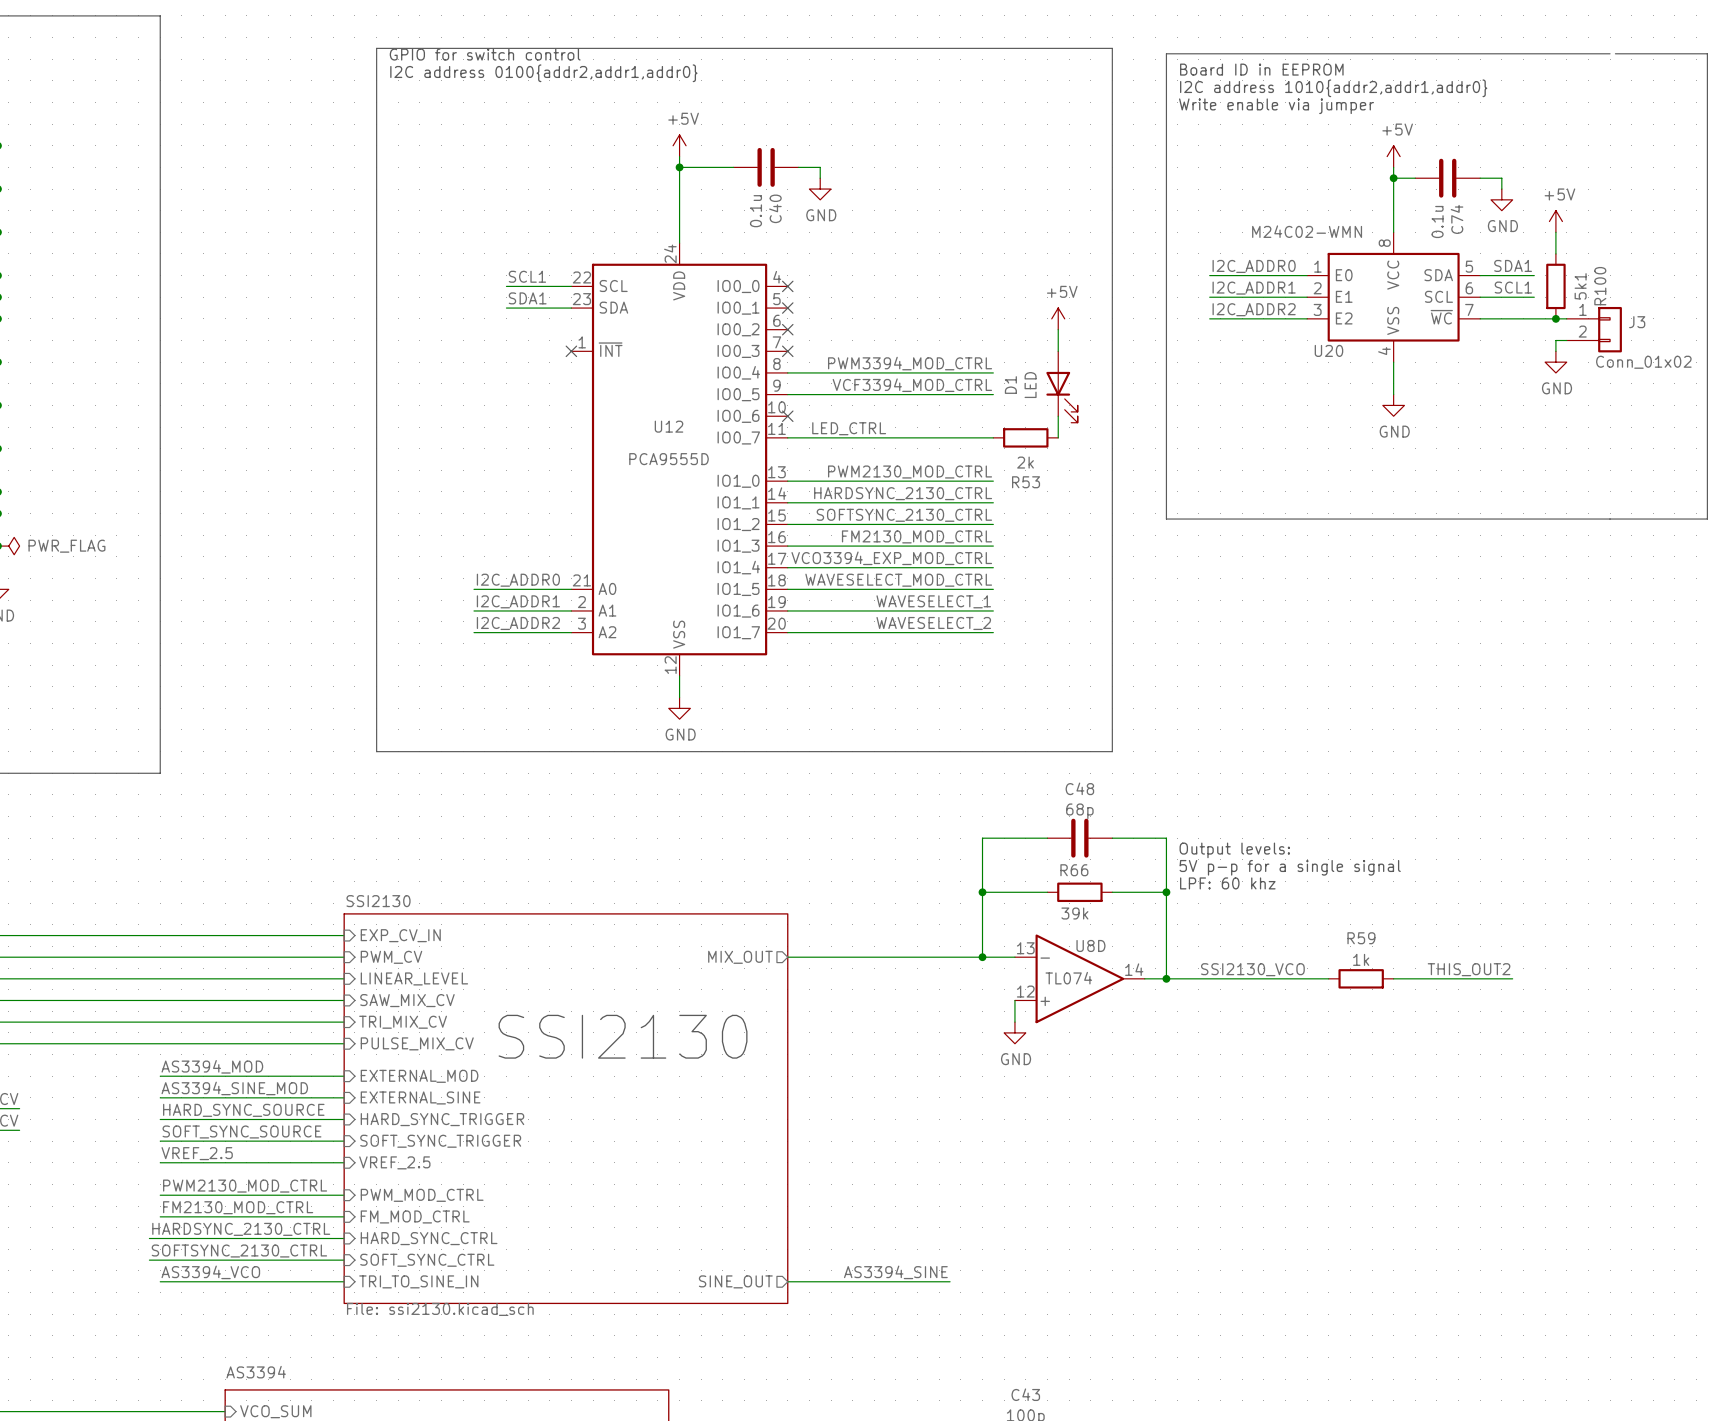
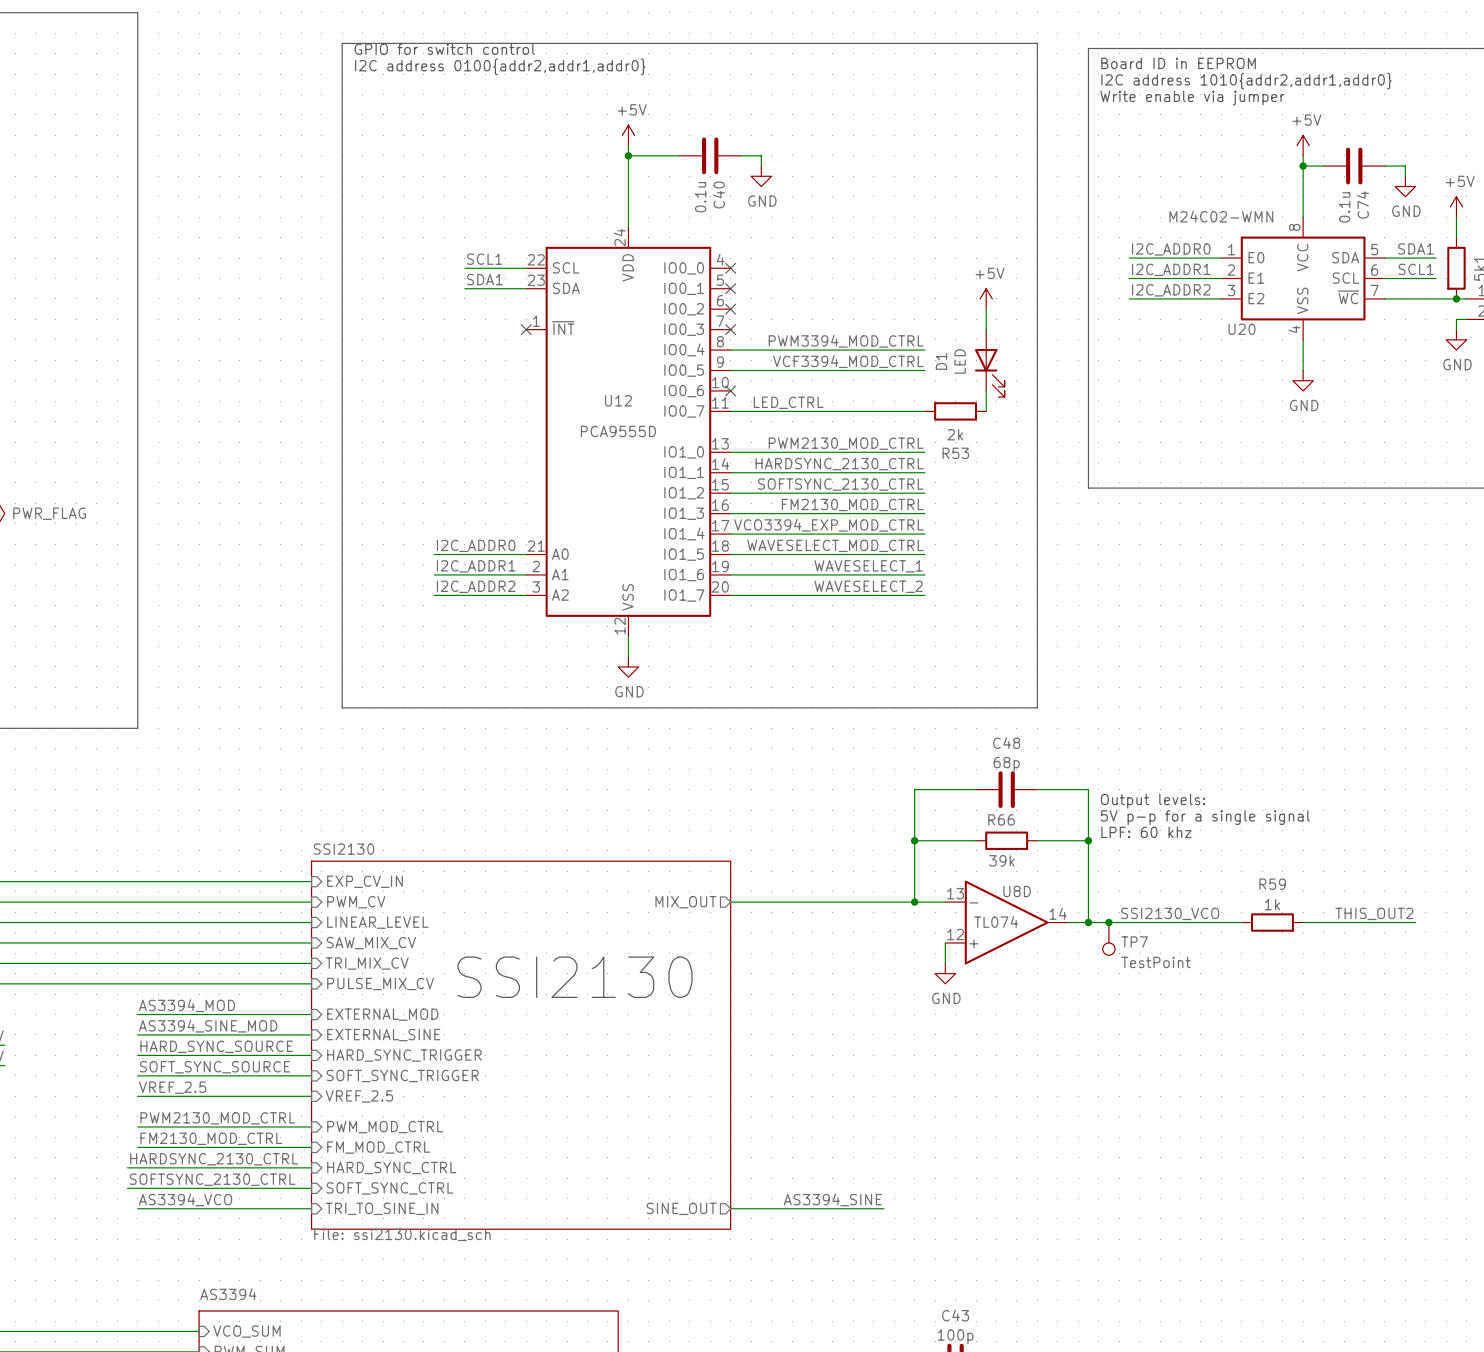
junction: none -> (1108, 922)
TP7: none -> TestPoint (1108, 938)

